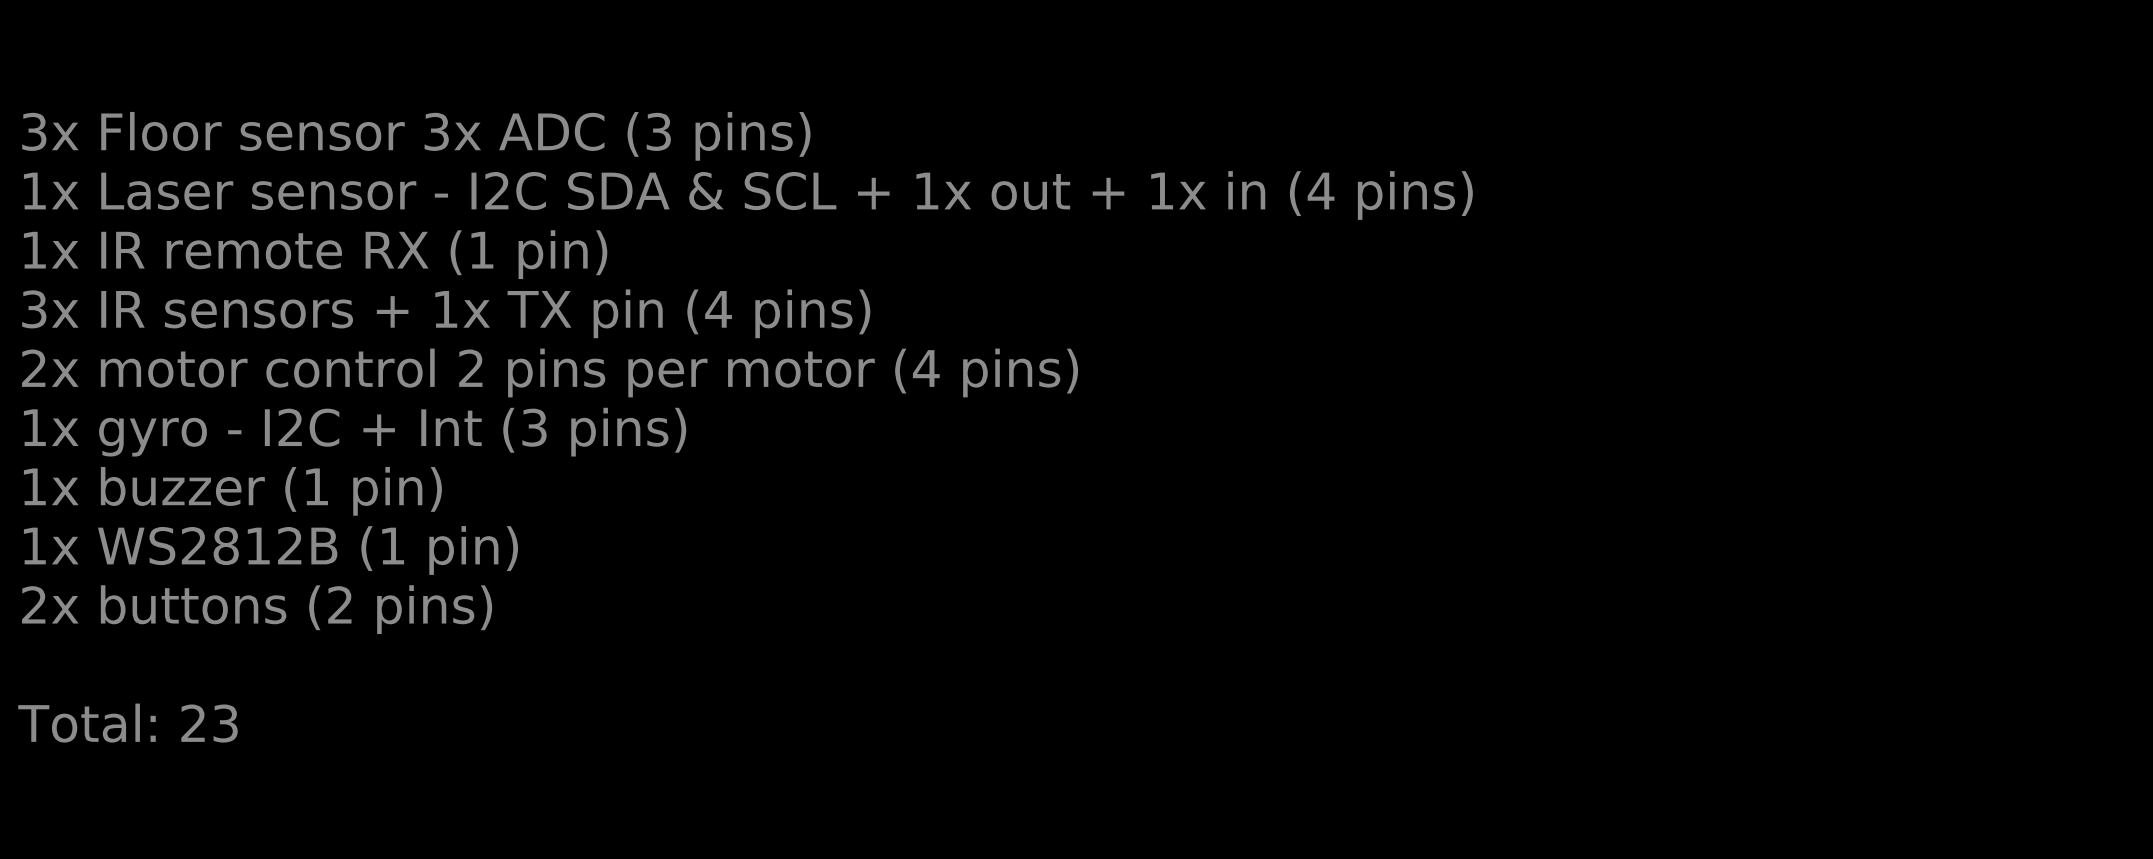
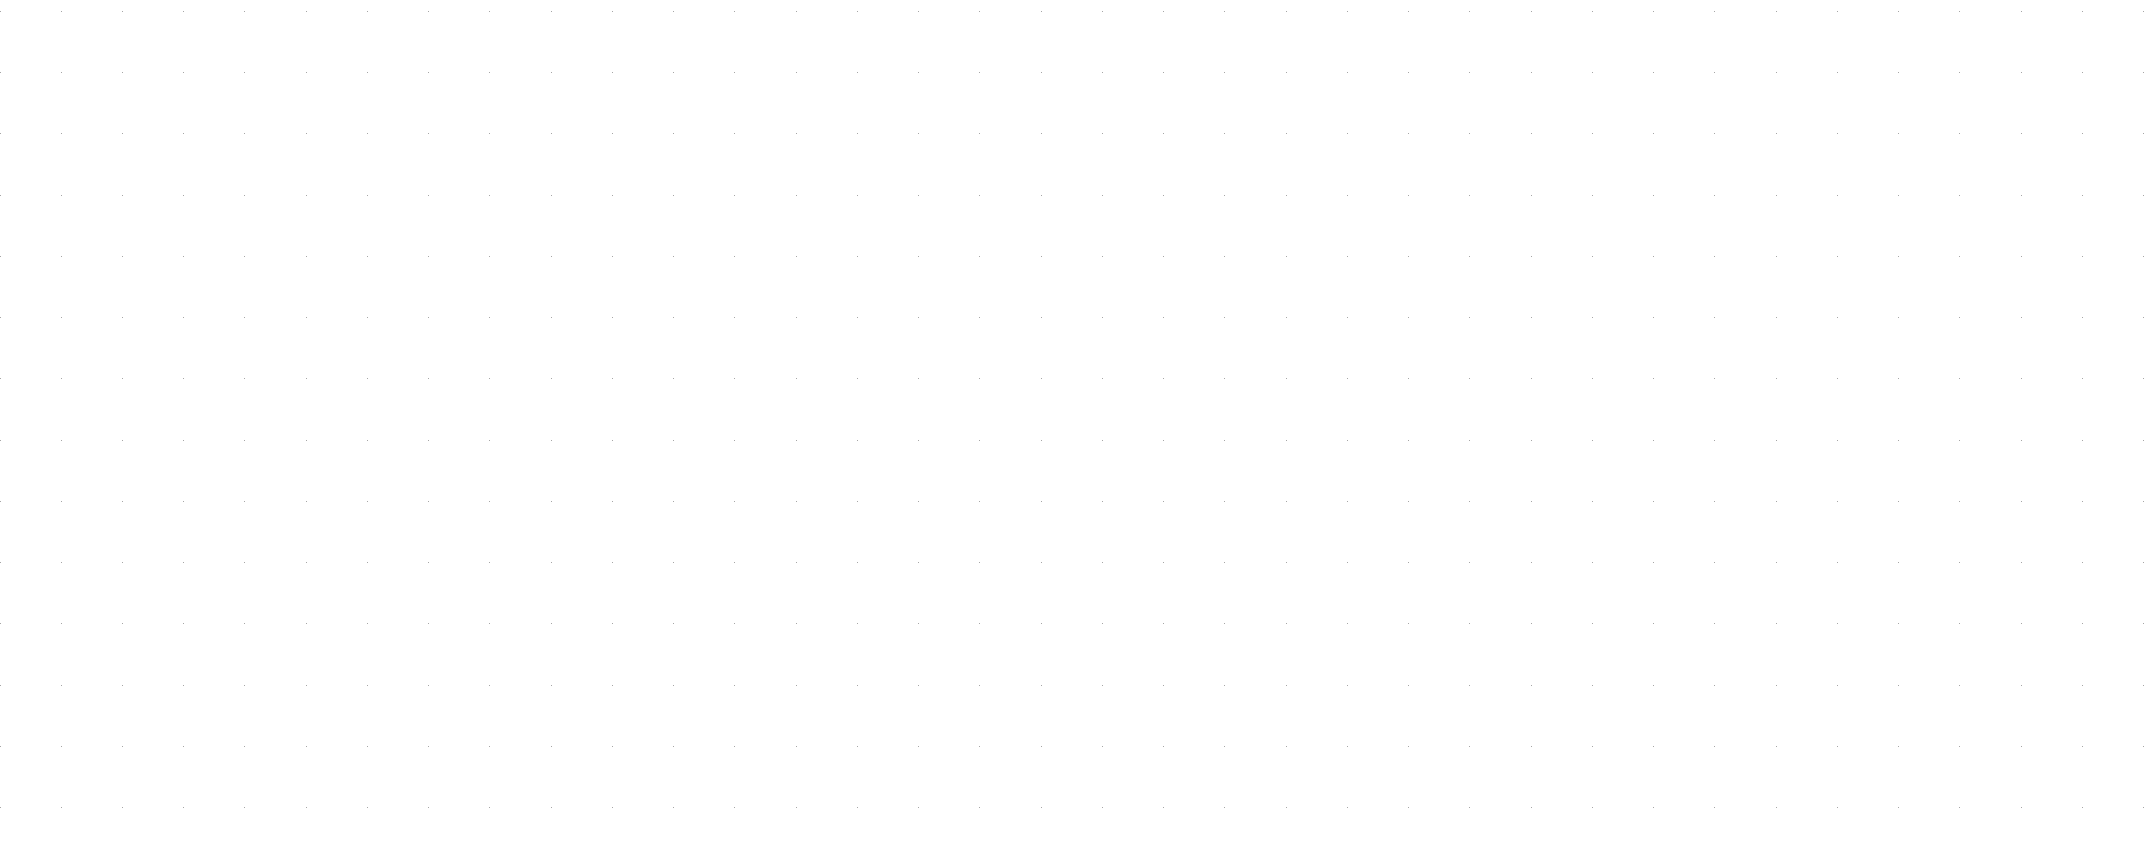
text: 3x Floor sensor 3x ADC (3 pins) (416, 136) -> none
text: 1x Laser sensor - I2C SDA & SCL + 1x out + 1x in (4 pins) (748, 195) -> none
text: 1x IR remote RX (1 pin) (315, 254) -> none
text: 3x IR sensors + 1x TX pin (4 pins) (446, 313) -> none
text: 2x motor control 2 pins per motor (4 pins) (550, 372) -> none
text: 1x gyro - I2C + Int (3 pins) (355, 432) -> none
text: 1x buzzer (1 pin) (232, 491) -> none
text: 1x WS2812B (1 pin) (270, 550) -> none
text: 2x buttons (2 pins) (257, 609) -> none
text: Total: 23 (127, 723) -> none

